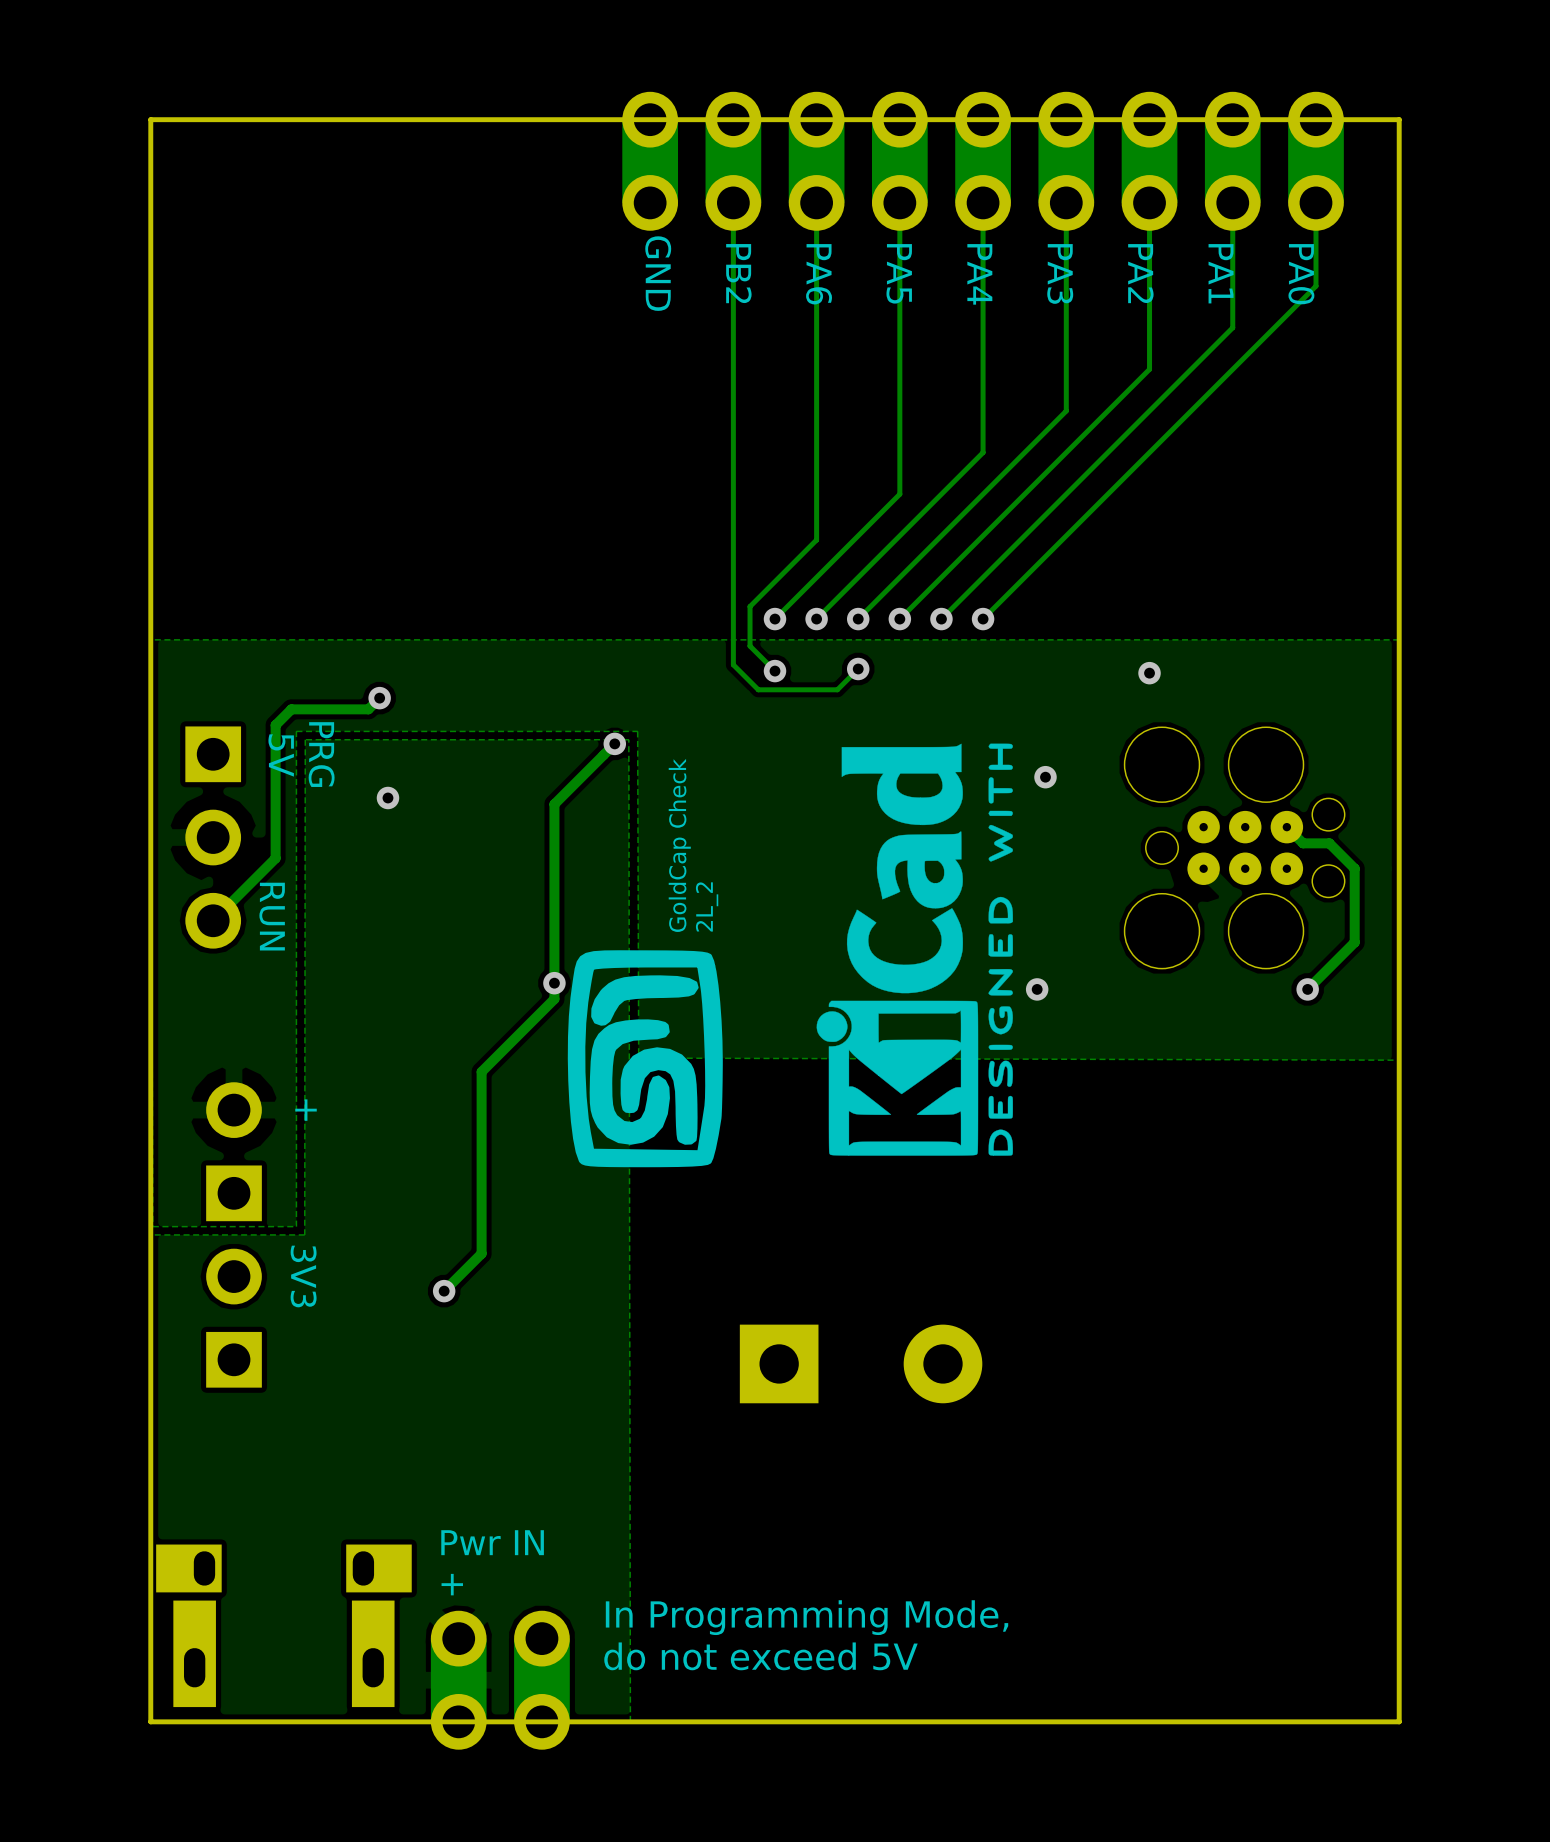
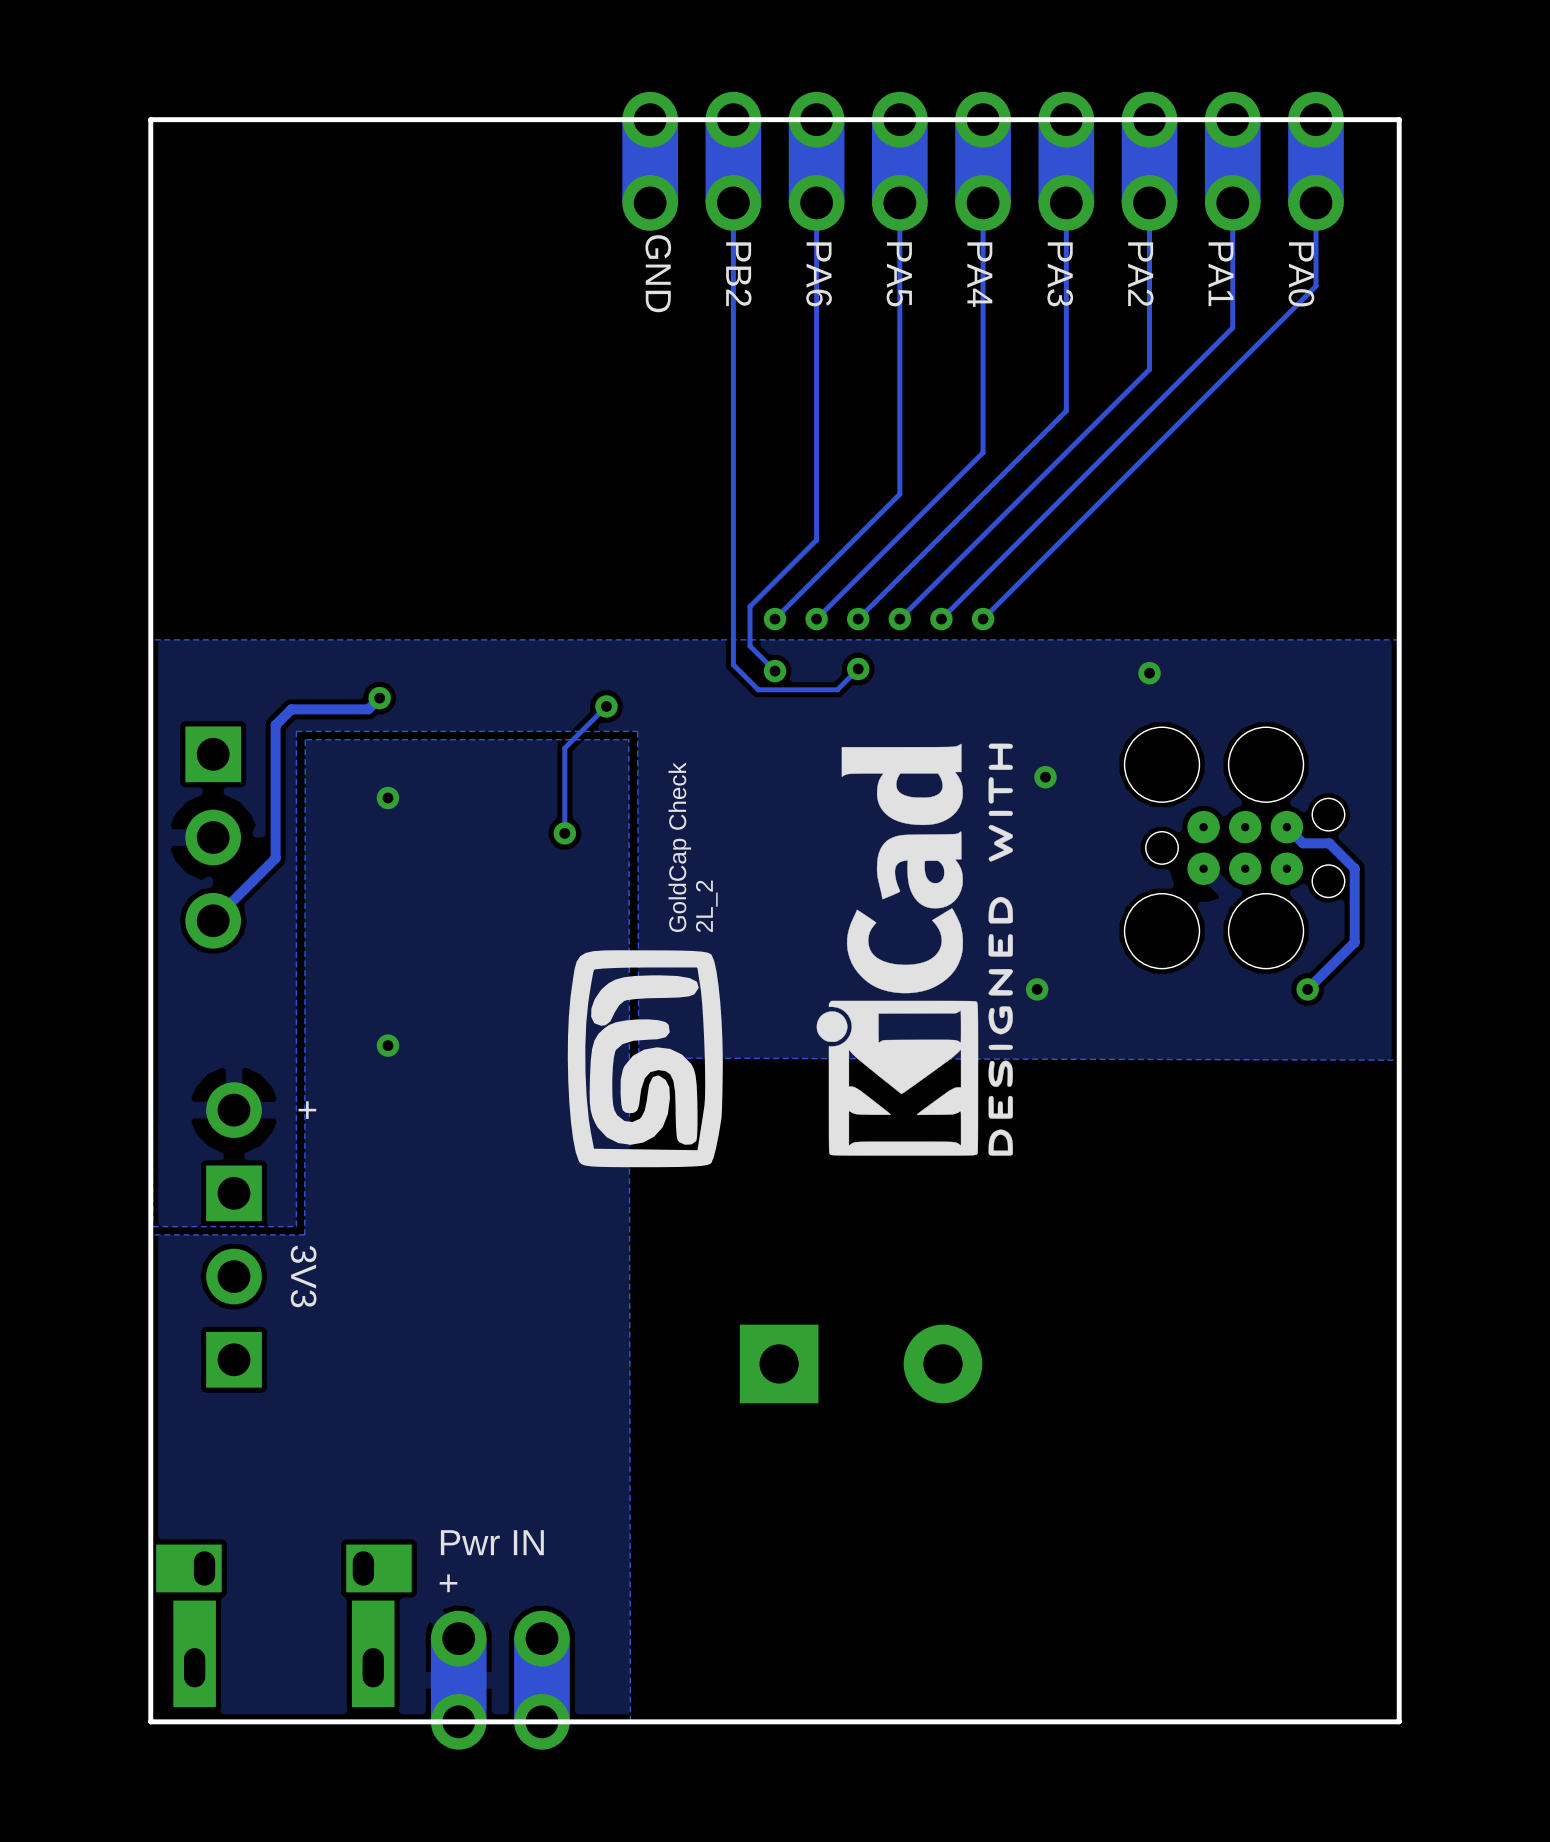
track: none -> (606, 706) (564, 748) (564, 833)
track: (614, 743) (554, 804) (554, 999) (481, 1071) (481, 1253) (444, 1291) -> none
via position: (614, 743) -> (606, 706)
text: PRG (321, 754) -> none
text: 5V (281, 755) -> none
via: none -> (564, 833)
text: RUN (272, 916) -> none
via: (554, 983) -> none
via: none -> (387, 1045)
via: (444, 1291) -> none
text: In Programming Mode, (807, 1617) -> none
text: do not exceed 5V (760, 1656) -> none

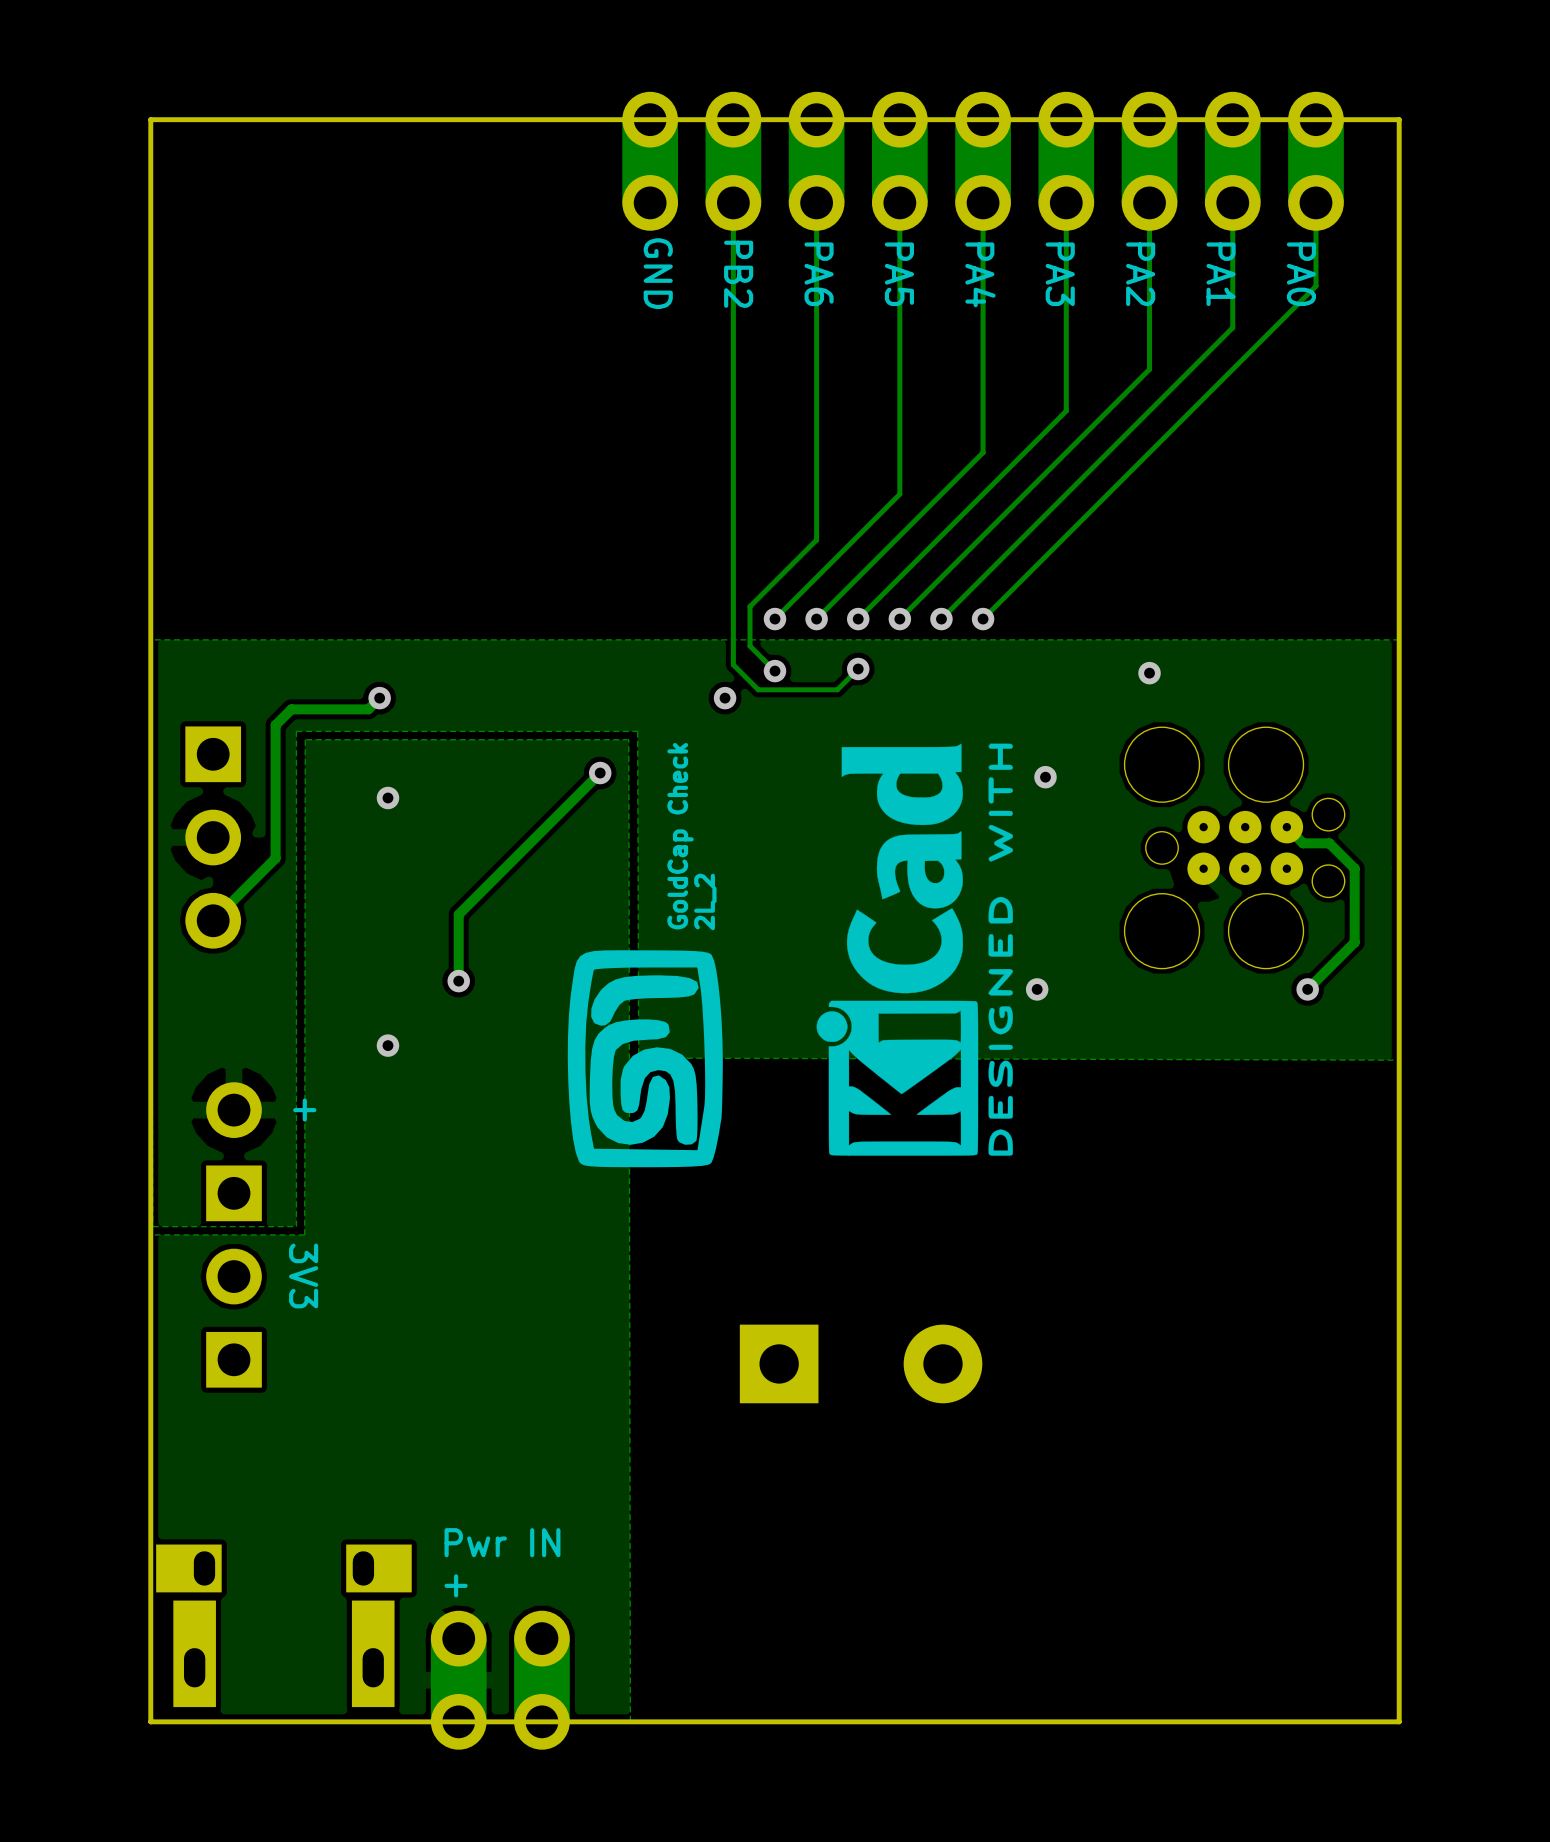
via: none -> (725, 698)
track: (606, 706) (564, 748) (564, 833) -> none
via: (606, 706) -> none
track: none -> (600, 773) (458, 914) (458, 981)
via: none -> (600, 773)
via: (564, 833) -> none
via: none -> (458, 981)

